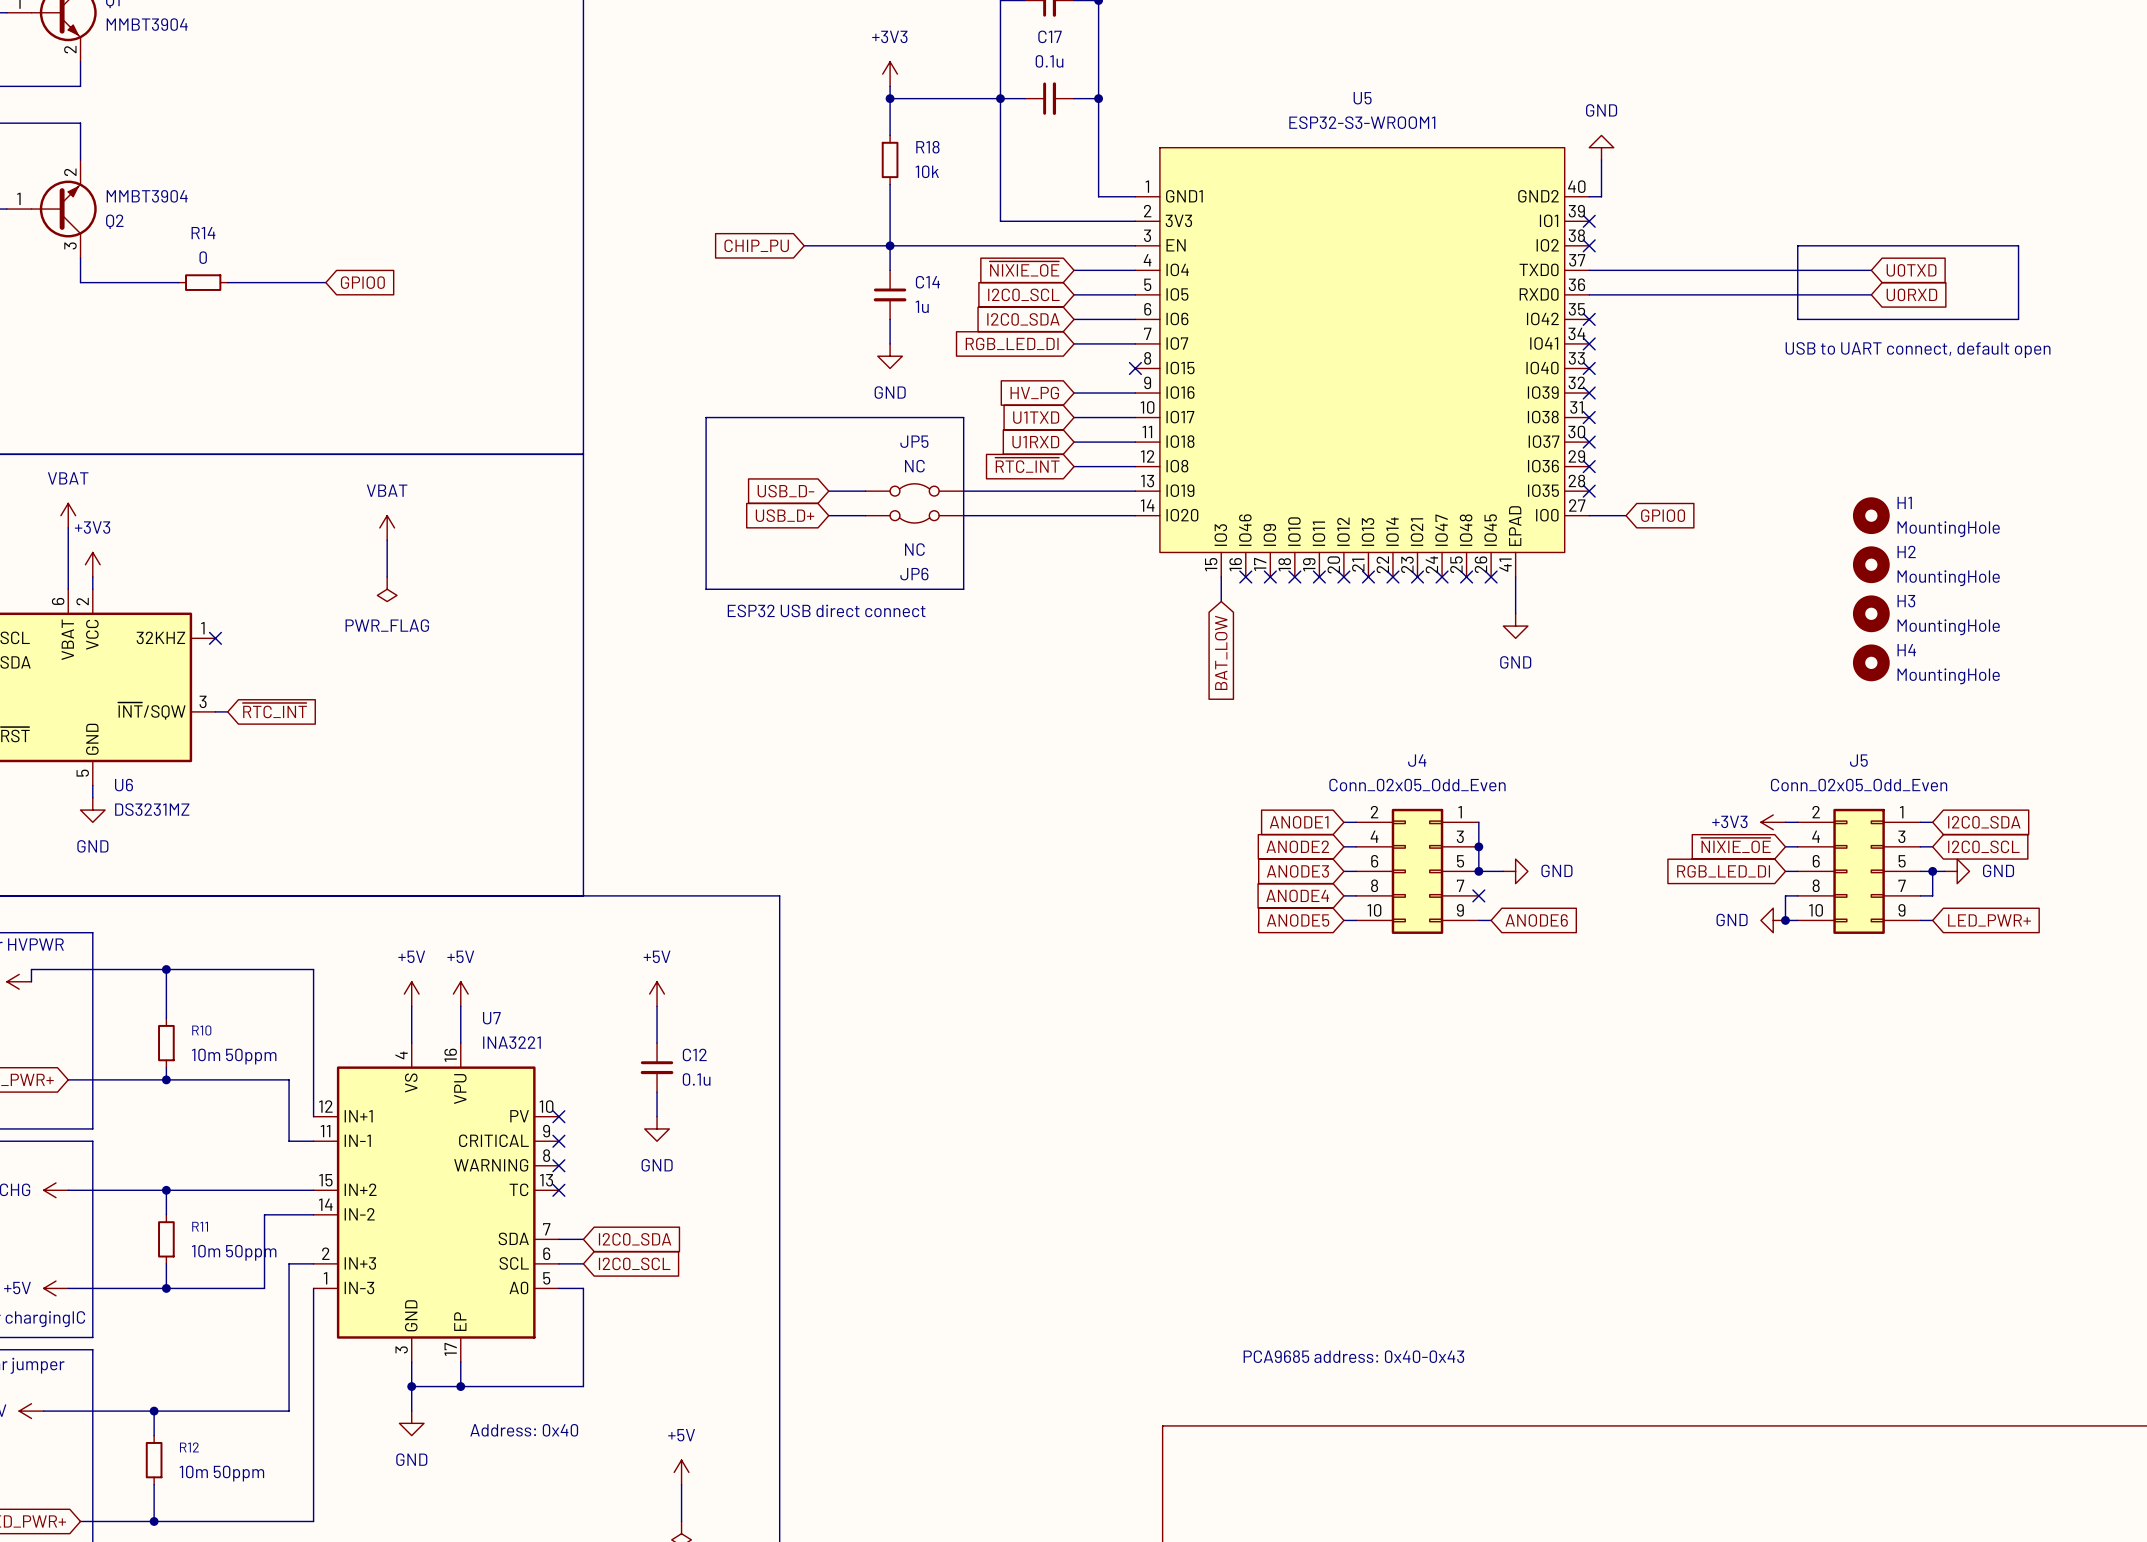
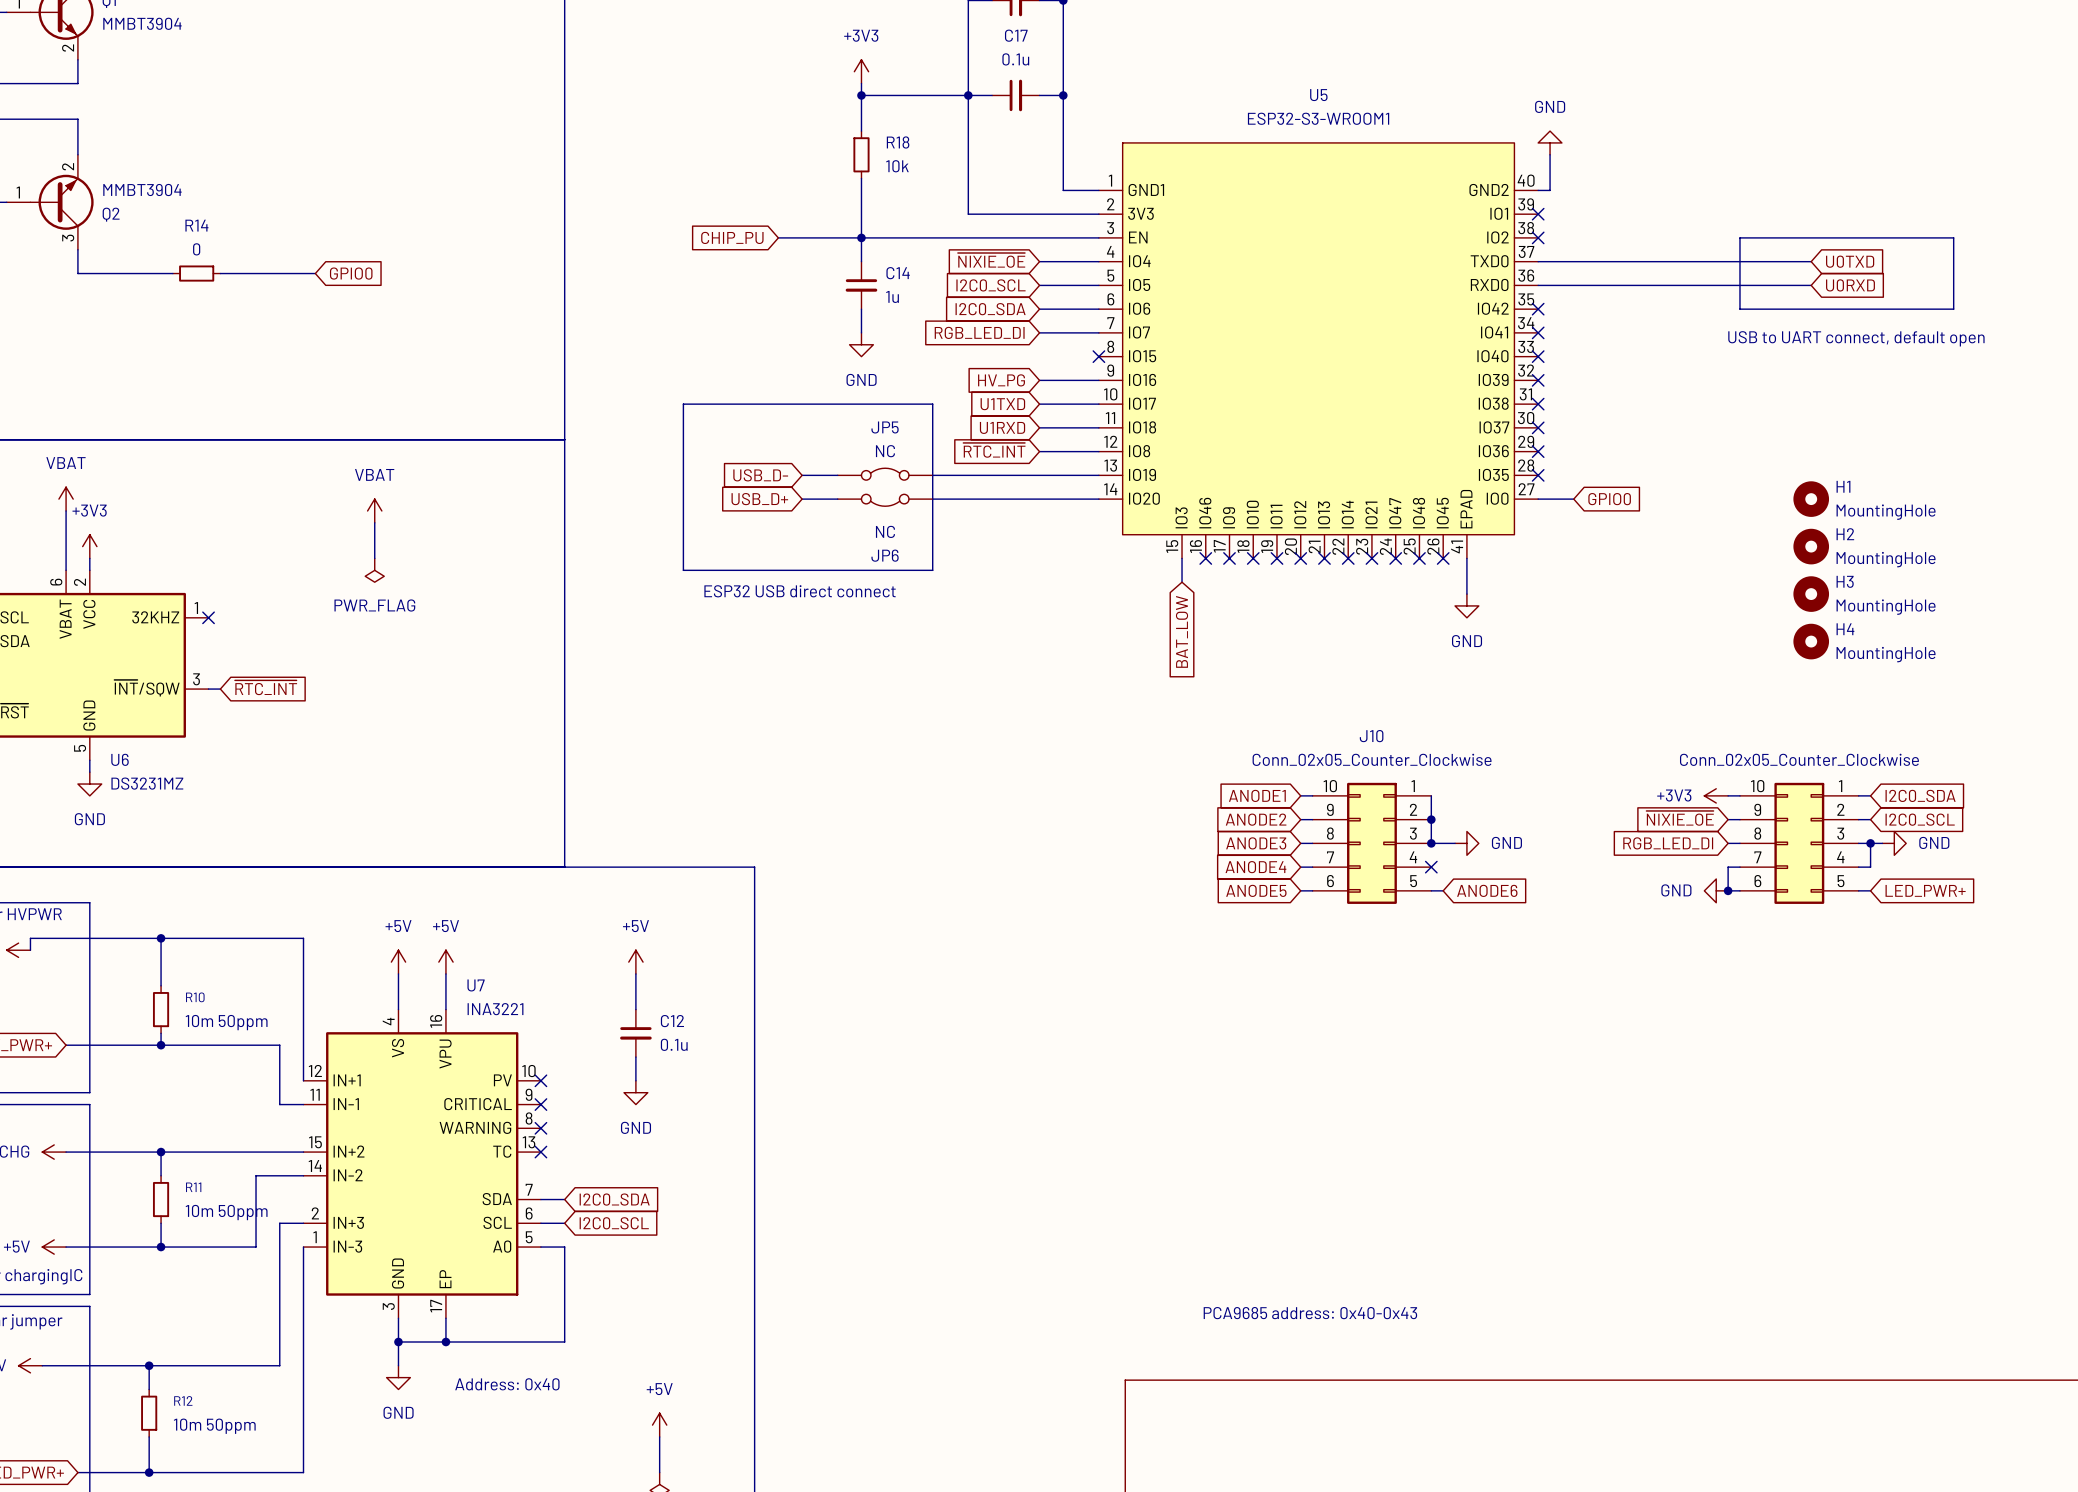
J4 name: J4 (1417, 760) -> J10 (1371, 736)
J5 name: J5 (1858, 760) -> none
J4 value: Conn_02x05_Odd_Even (1417, 785) -> Conn_02x05_Counter_Clockwise (1372, 759)
J5 value: Conn_02x05_Odd_Even (1859, 785) -> Conn_02x05_Counter_Clockwise (1799, 759)
J4 symbol: [1356, 808, 1479, 934] -> [1312, 782, 1432, 904]
J5 symbol: [1797, 808, 1921, 934] -> [1739, 782, 1859, 904]

